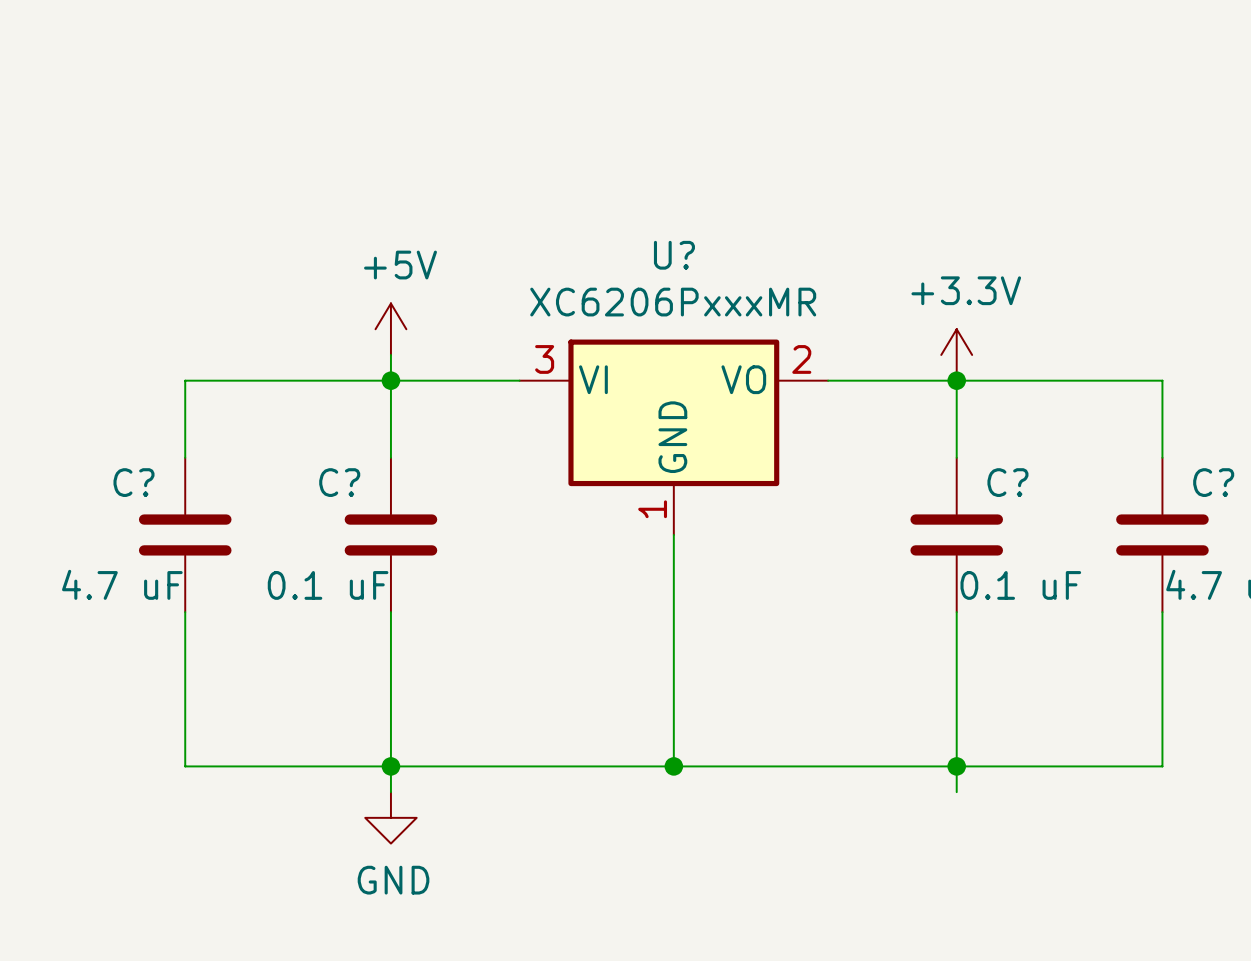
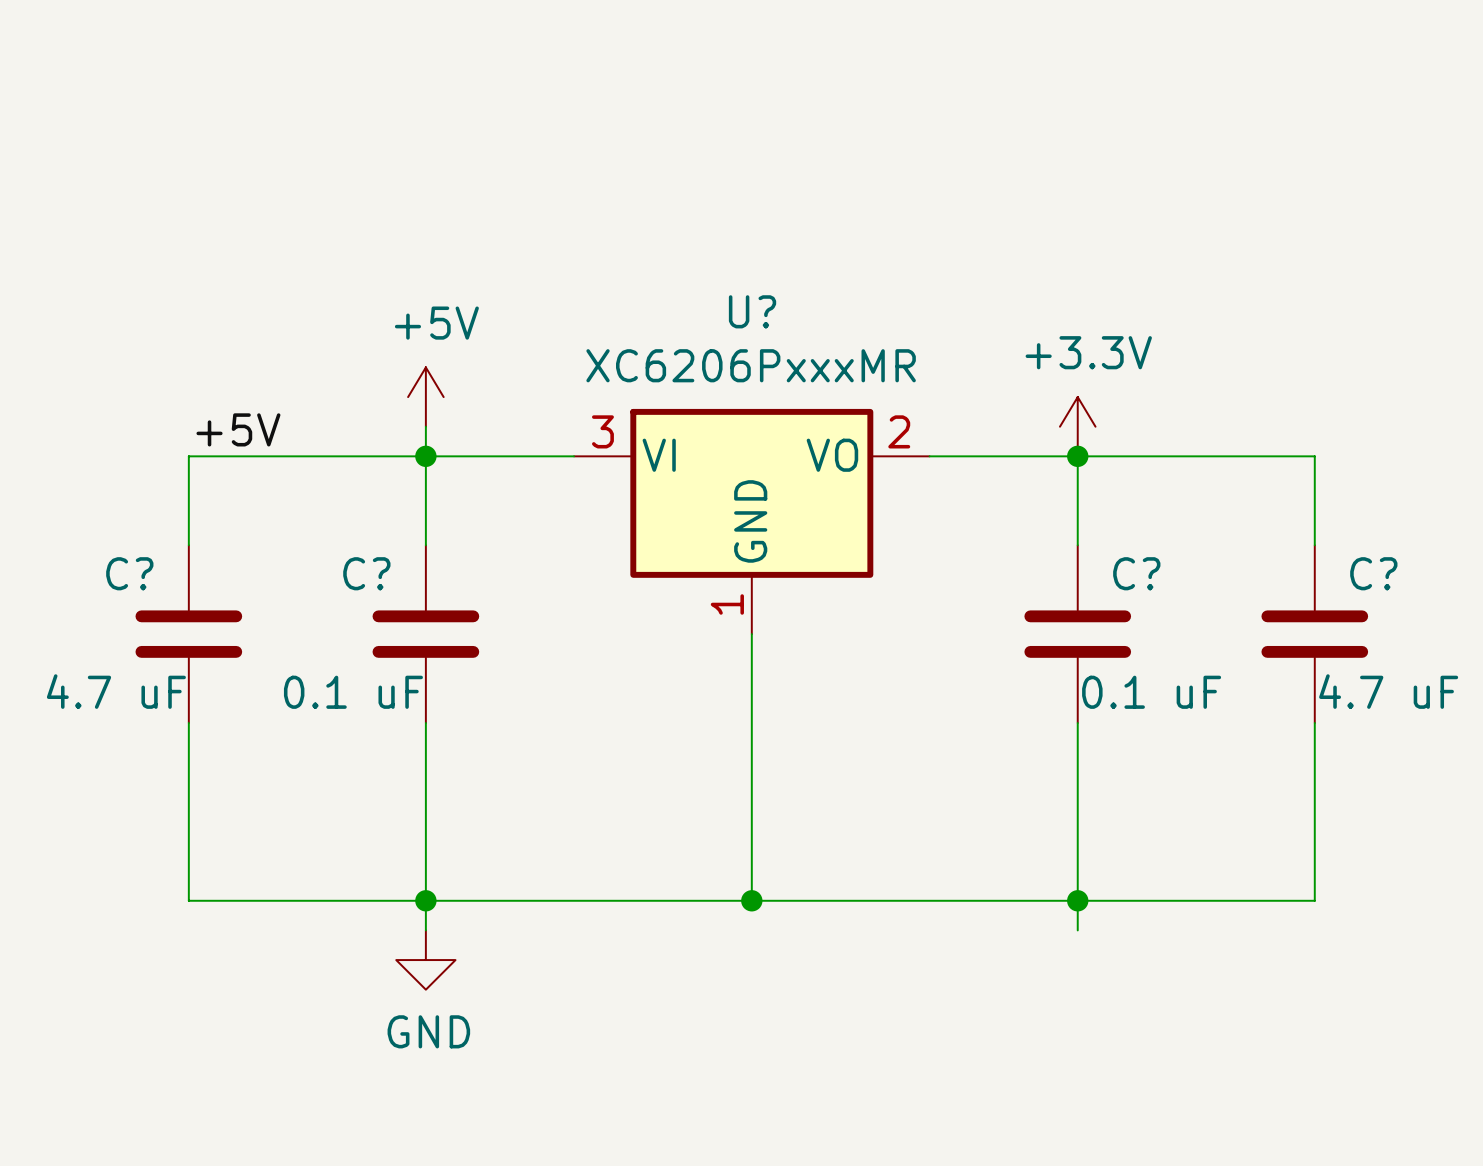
label: none -> +5V (238, 429)

